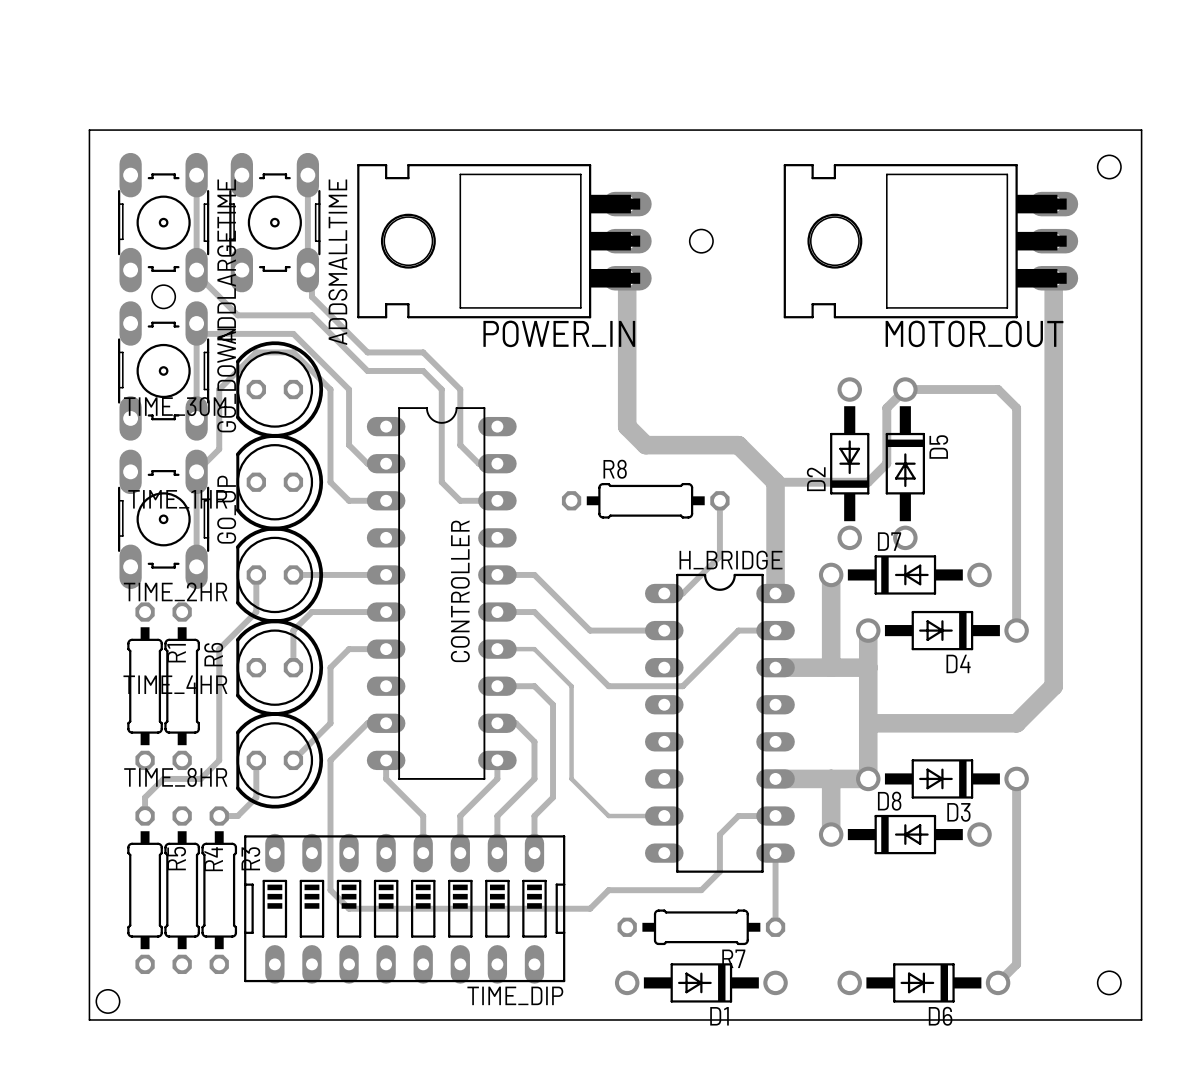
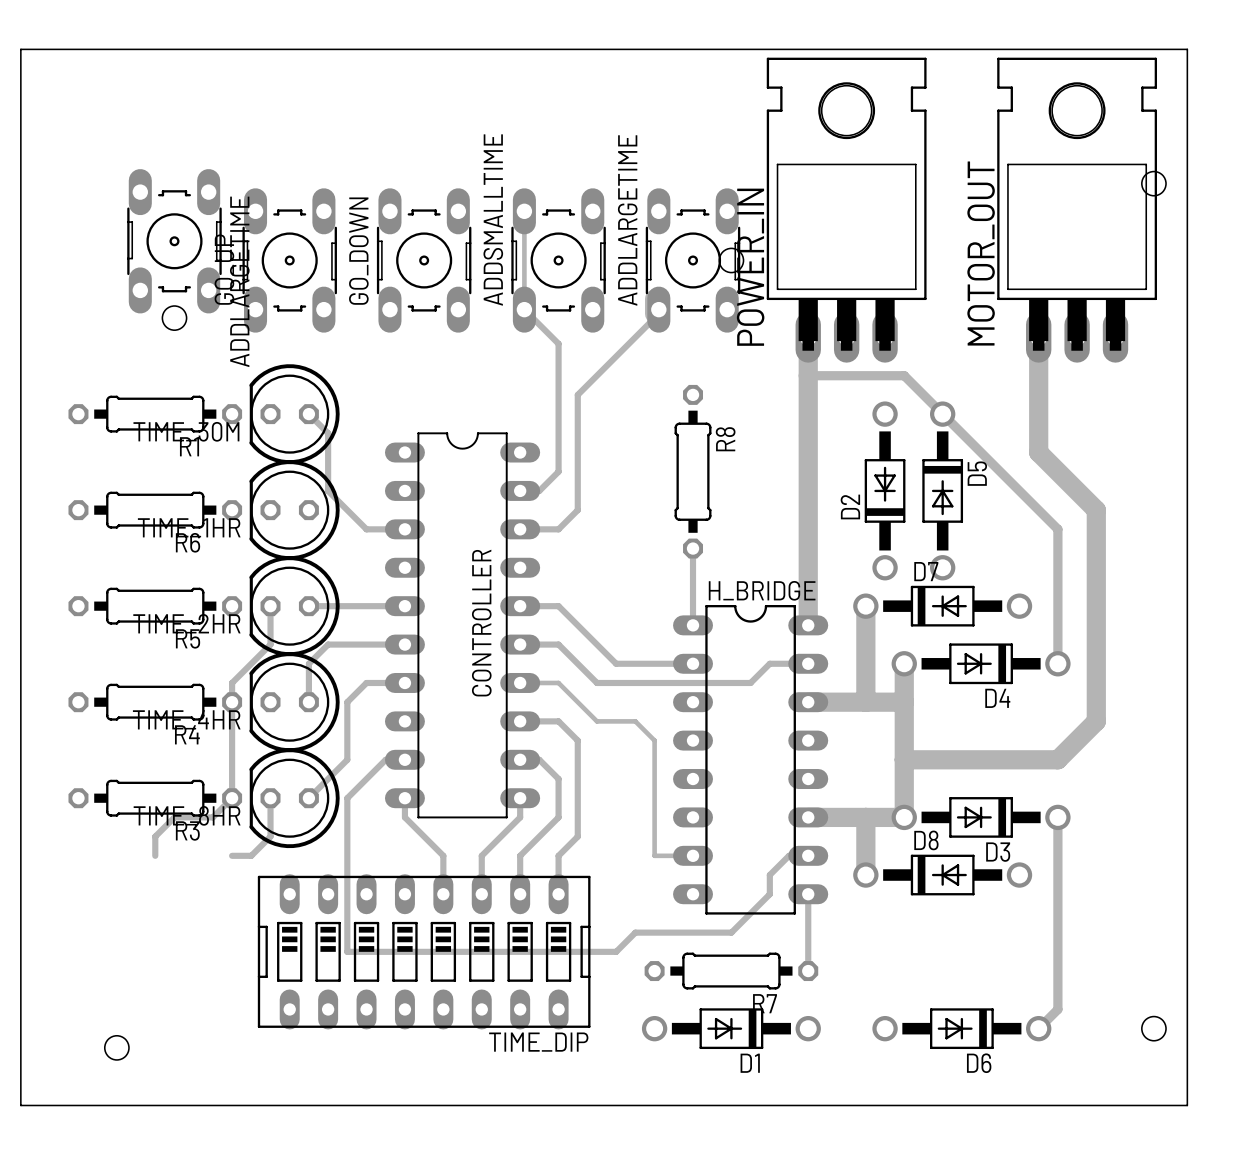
board edge: (1141, 130) (89, 130) (89, 1019) (1141, 1019) -> (1187, 145) (1187, 49) (20, 49) (20, 1105) (1187, 1105) (1187, 1067)
track: (196, 175) (196, 274) (237, 315) (311, 315) (367, 370) (423, 370) (441, 389) (441, 482) (460, 500) (497, 500) -> (654, 318) (577, 394) (577, 510) (558, 529) (520, 529)
track: (307, 175) (307, 270) (311, 274) (311, 296) (367, 352) (423, 352) (460, 389) (460, 445) (478, 463) (497, 463) -> (524, 211) (524, 309) (558, 343) (558, 471) (539, 490) (520, 490)
ADDSMALLTIME rotation: 0° (274, 222) -> 180° (558, 260)
ADDSMALLTIME position: (274, 222) -> (558, 260)
POWER_IN rotation: 0° (504, 241) -> 90° clockwise (846, 210)
POWER_IN position: (504, 241) -> (846, 210)
ADDLARGETIME: none -> (693, 260)
MOTOR_OUT rotation: 0° (930, 241) -> 90° clockwise (1077, 210)
track: (1053, 278) (1053, 482) -> (1038, 337) (1038, 452) (1096, 510)
track: (627, 296) (627, 426) (645, 445) (738, 445) (775, 482) (868, 482) (886, 463) (886, 408) (905, 389) (998, 389) (1016, 408) (1016, 500) -> (808, 375) (904, 375) (1057, 529)
track: none -> (808, 337) (808, 510)
GO_DOWN rotation: 0° (163, 370) -> 180° (424, 260)
GO_DOWN position: (163, 370) -> (424, 260)
track: (196, 418) (196, 323) (200, 327) (200, 333) (293, 333) (349, 389) (349, 445) (367, 463) (386, 463) -> none
track: (330, 482) (330, 389) (293, 352) (256, 352) (219, 389) (219, 449) (196, 471) (196, 566) -> (347, 510) (328, 490) (328, 433) (308, 414)
R8 rotation: 0° (645, 500) -> 90° clockwise (693, 471)
track: (719, 500) (719, 556) (682, 593) (664, 593) -> (693, 548) (693, 625)
GO_UP rotation: 0° (163, 519) -> 180° (289, 260)
GO_UP position: (163, 519) -> (289, 260)
track: (571, 649) (608, 686) (682, 686) (719, 649) -> (596, 682) (750, 682)
R1 rotation: 0° (145, 686) -> 90° clockwise (155, 414)
R1 position: (145, 686) -> (155, 414)
R6 rotation: 0° (182, 686) -> 90° clockwise (155, 510)
R6 position: (182, 686) -> (155, 510)
track: (571, 686) (571, 778) (608, 816) (627, 816) -> (596, 721) (635, 721) (654, 740) (654, 855)
track: (757, 816) (738, 816) (719, 834) (719, 871) -> (789, 855) (769, 875) (769, 894) (750, 913)
R5 rotation: 0° (145, 890) -> 90° clockwise (155, 606)
R5 position: (145, 890) -> (155, 606)
R4 rotation: 0° (182, 890) -> 90° clockwise (155, 702)
R4 position: (182, 890) -> (155, 702)
R3 rotation: 0° (219, 890) -> 90° clockwise (155, 798)
R3 position: (219, 890) -> (155, 798)
track: (330, 890) (349, 908) -> (347, 932) (347, 951) (366, 951)

